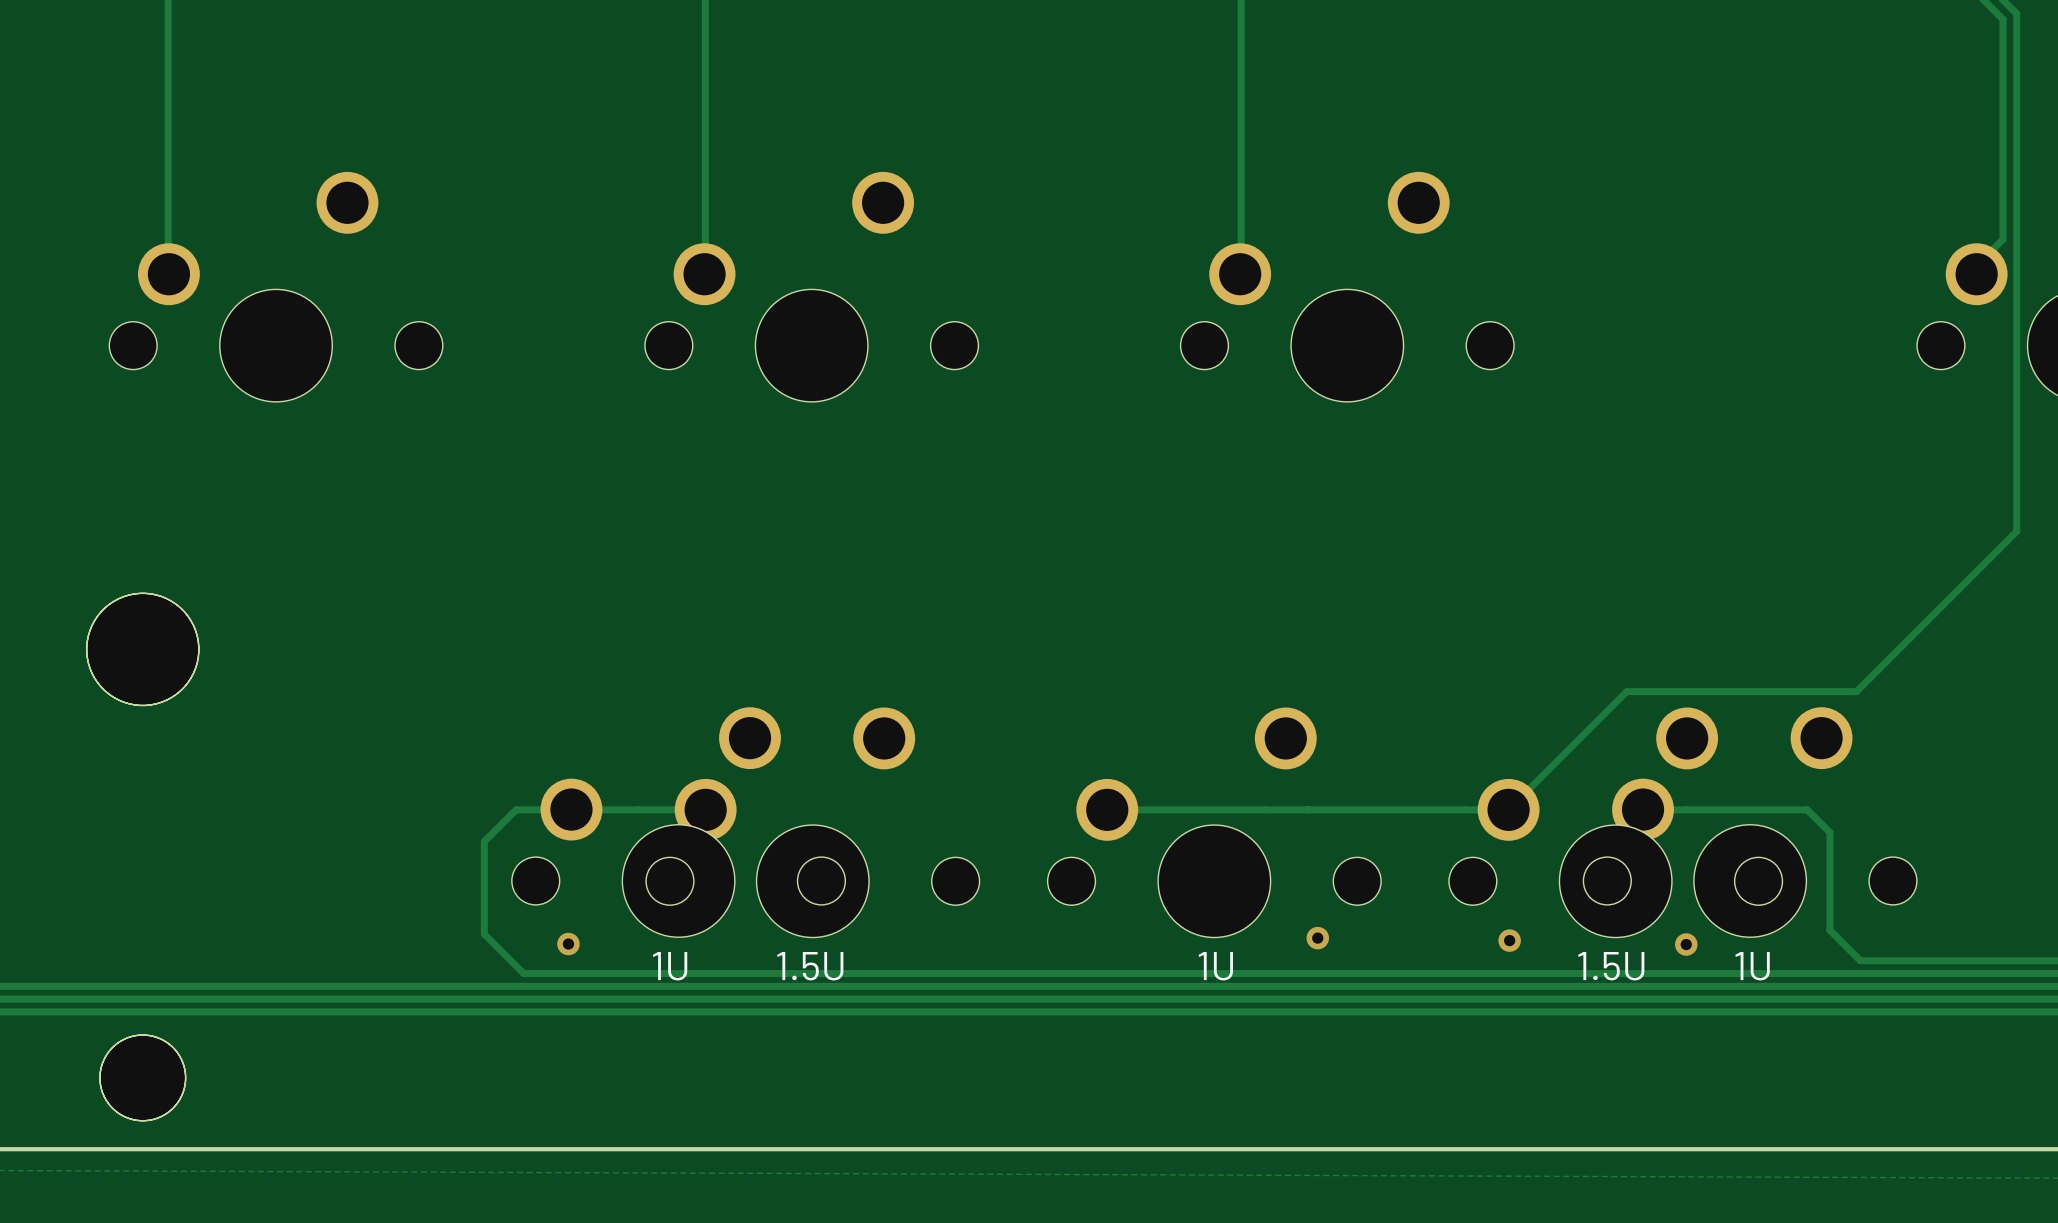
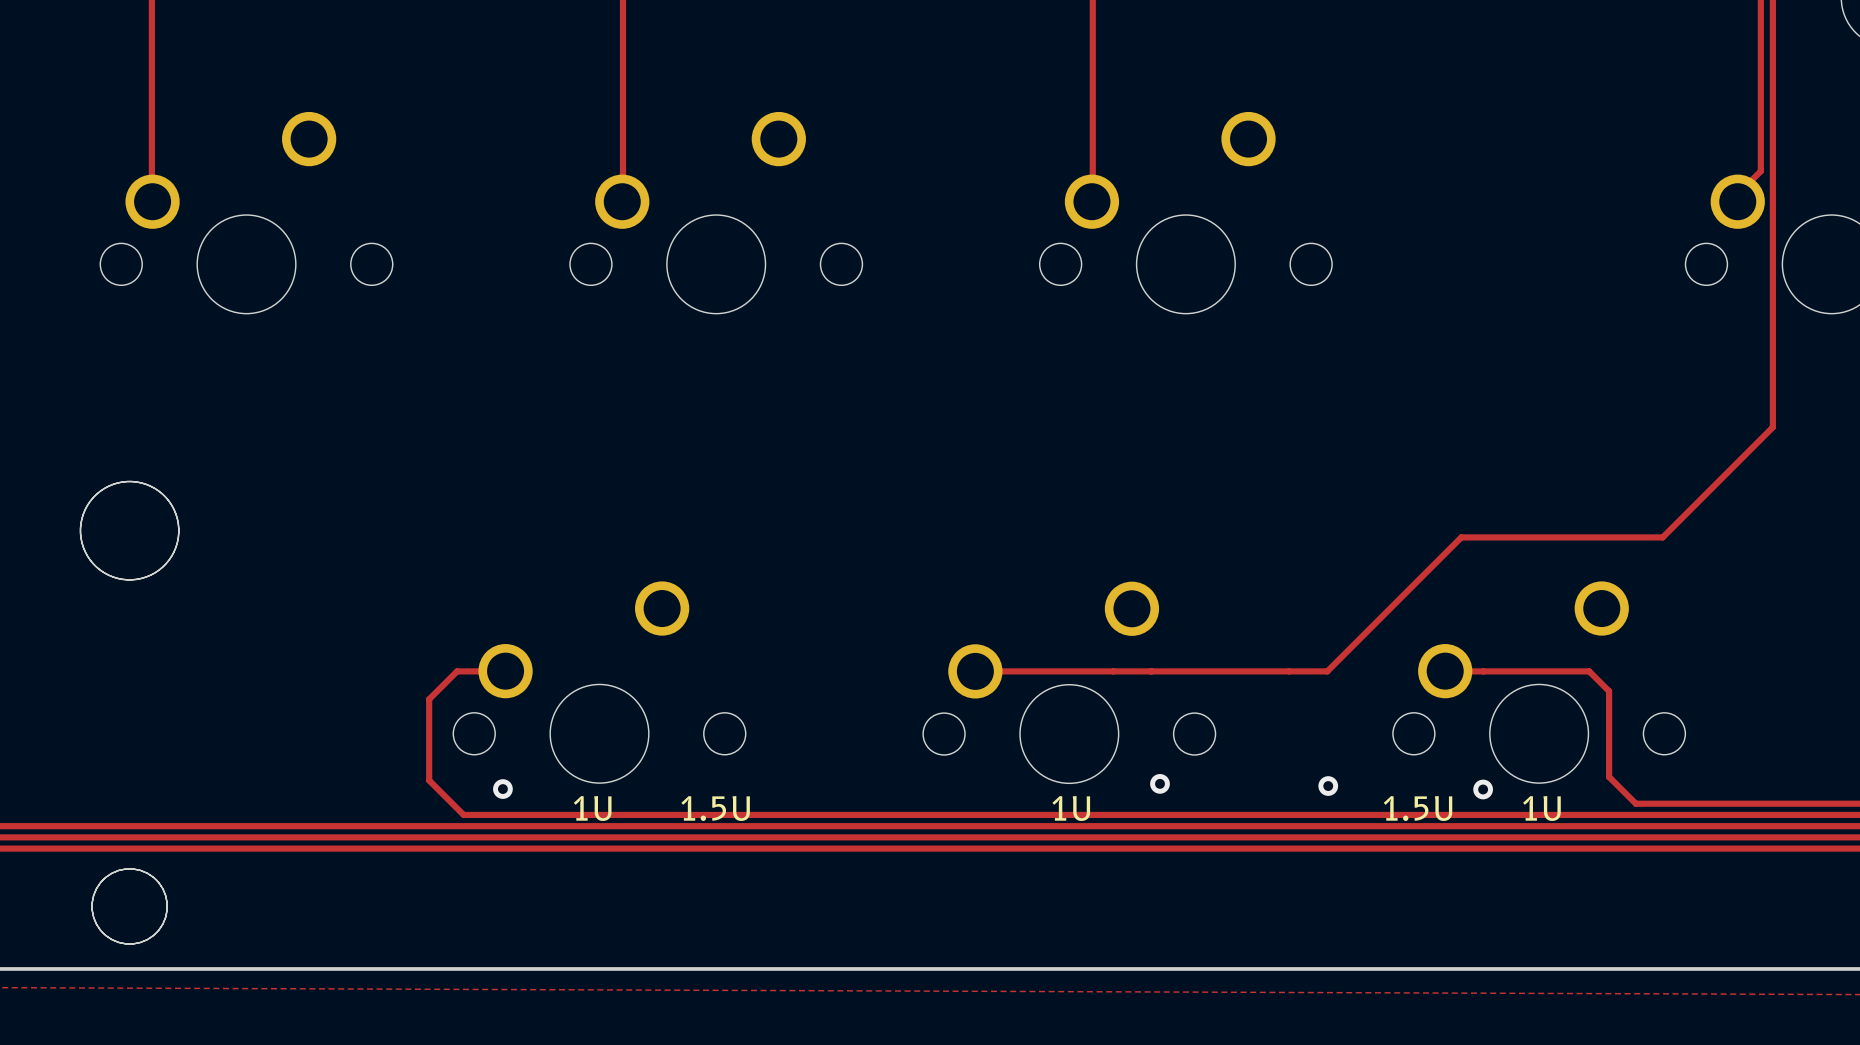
track: (1891, 657) (1856, 691) (1626, 691) -> (1662, 537) (1461, 537) (1430, 567)
track: (571, 809) (705, 809) -> none
part: (812, 822) -> none
part: (1615, 822) -> none

